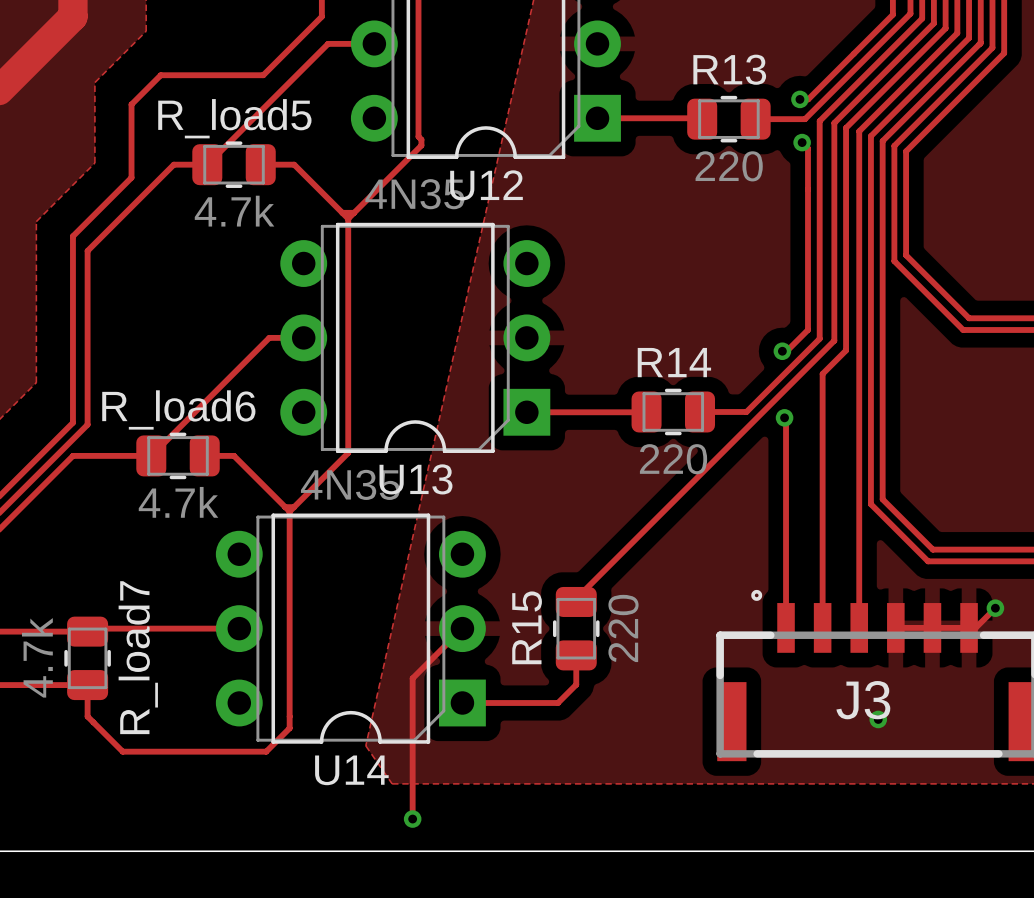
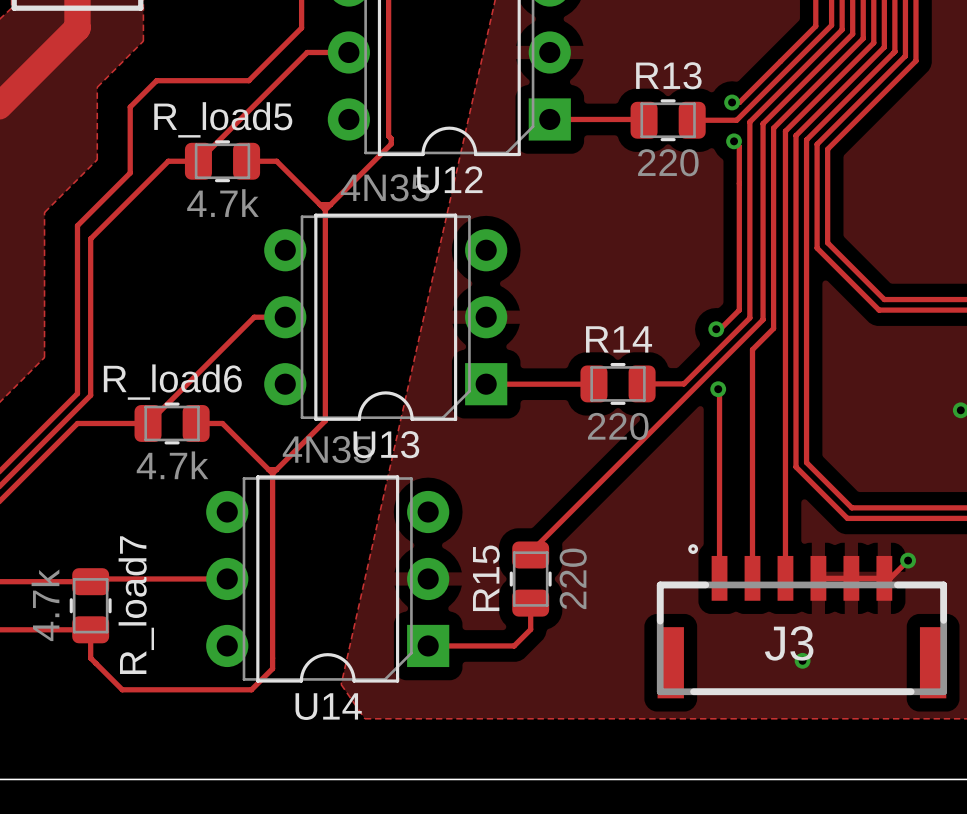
track: (462, 628) (412, 678) (412, 819) -> none
via: (412, 819) -> none

